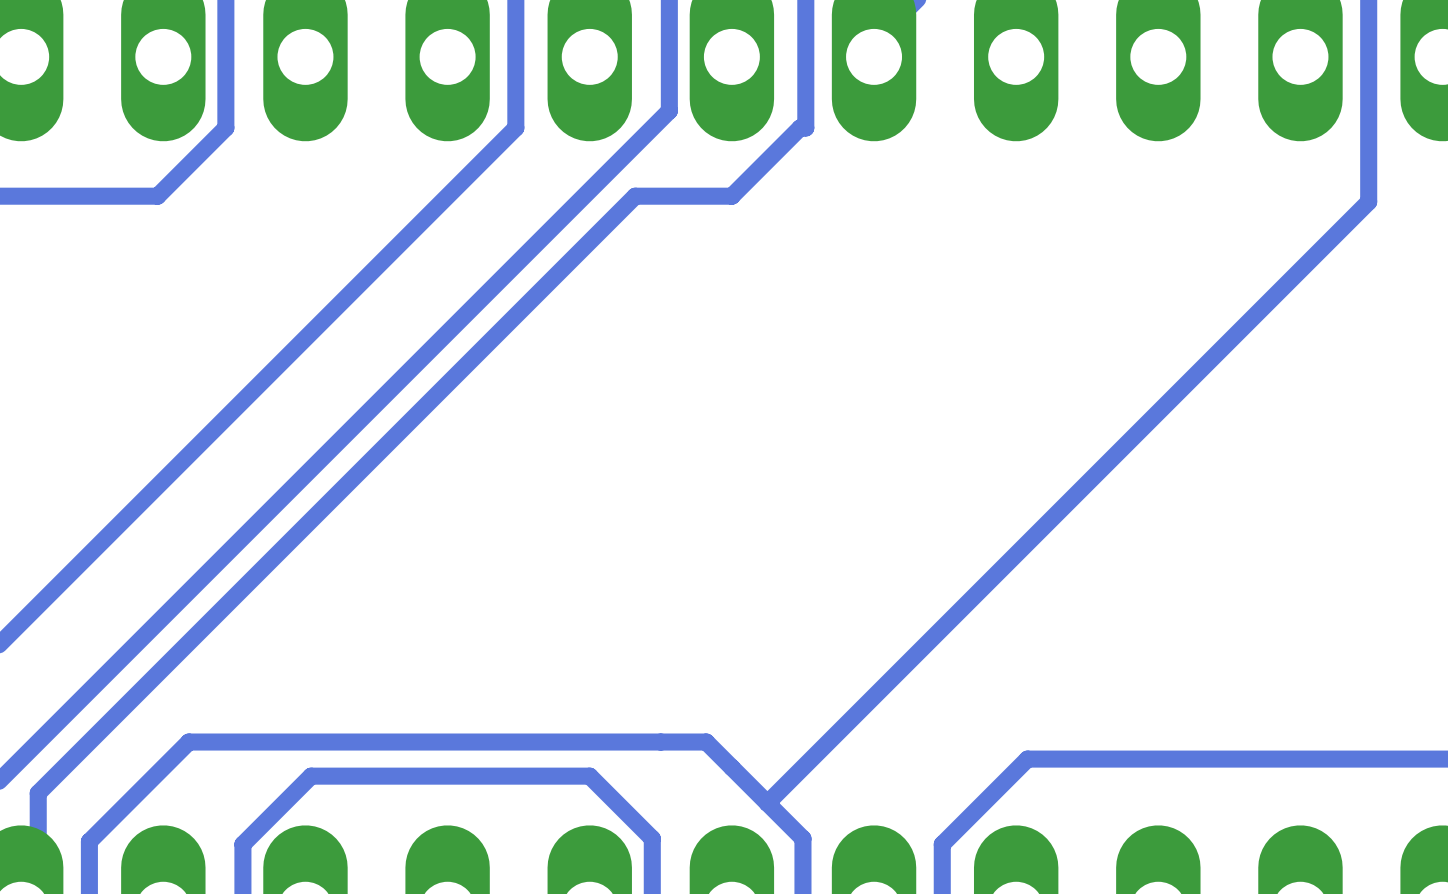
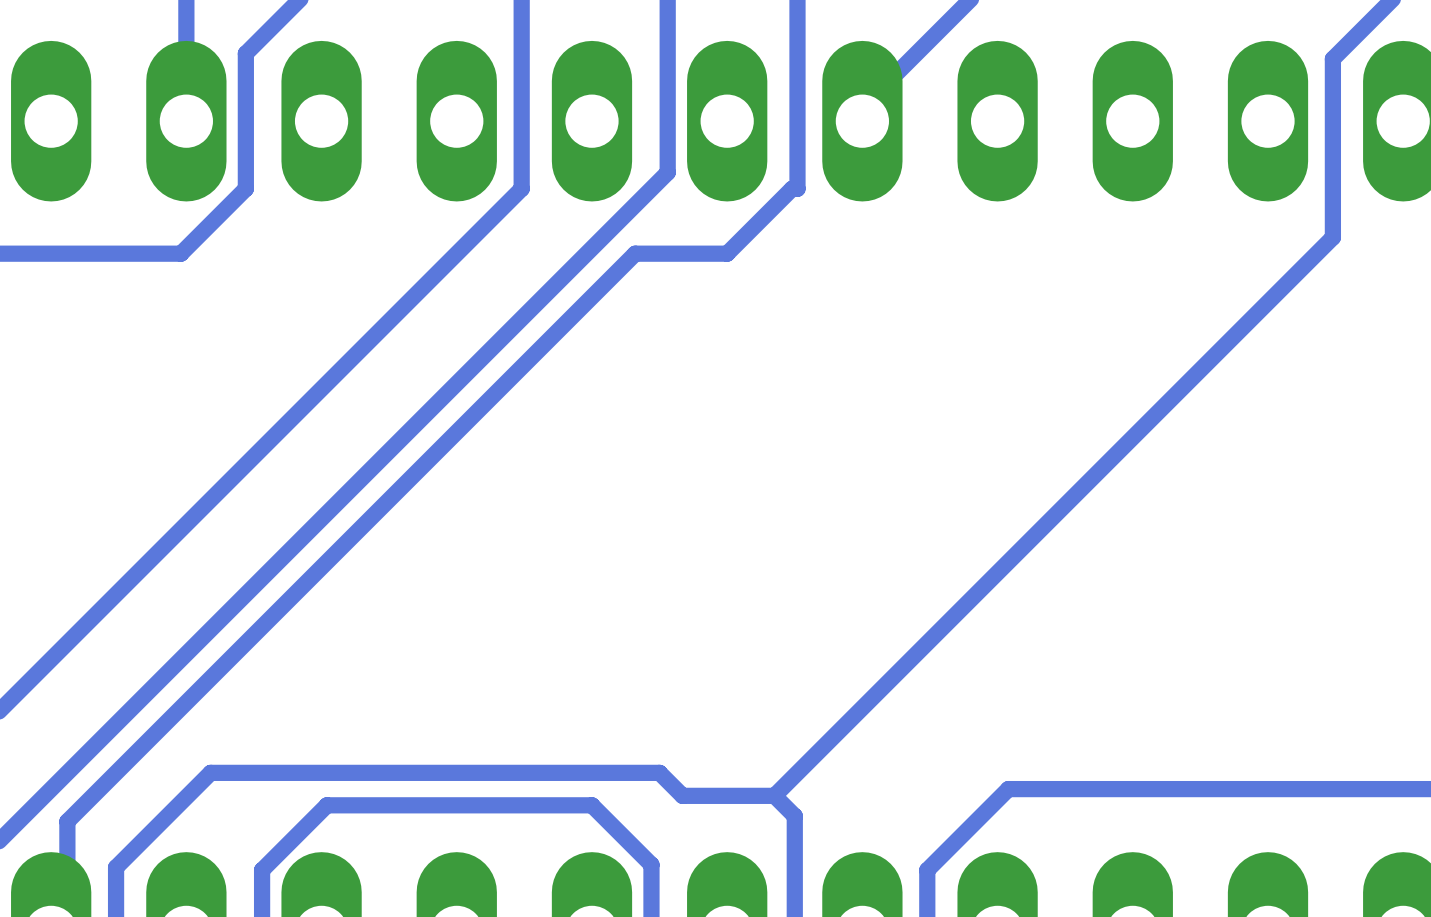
bottom track: (1368, 179) (1368, 201) (767, 803) -> (1332, 237) (774, 795)
bottom track: (660, 742) (706, 742) (802, 838) -> (659, 772) (682, 795) (774, 795)
bottom track: none -> (774, 795) (794, 816) (794, 864)

